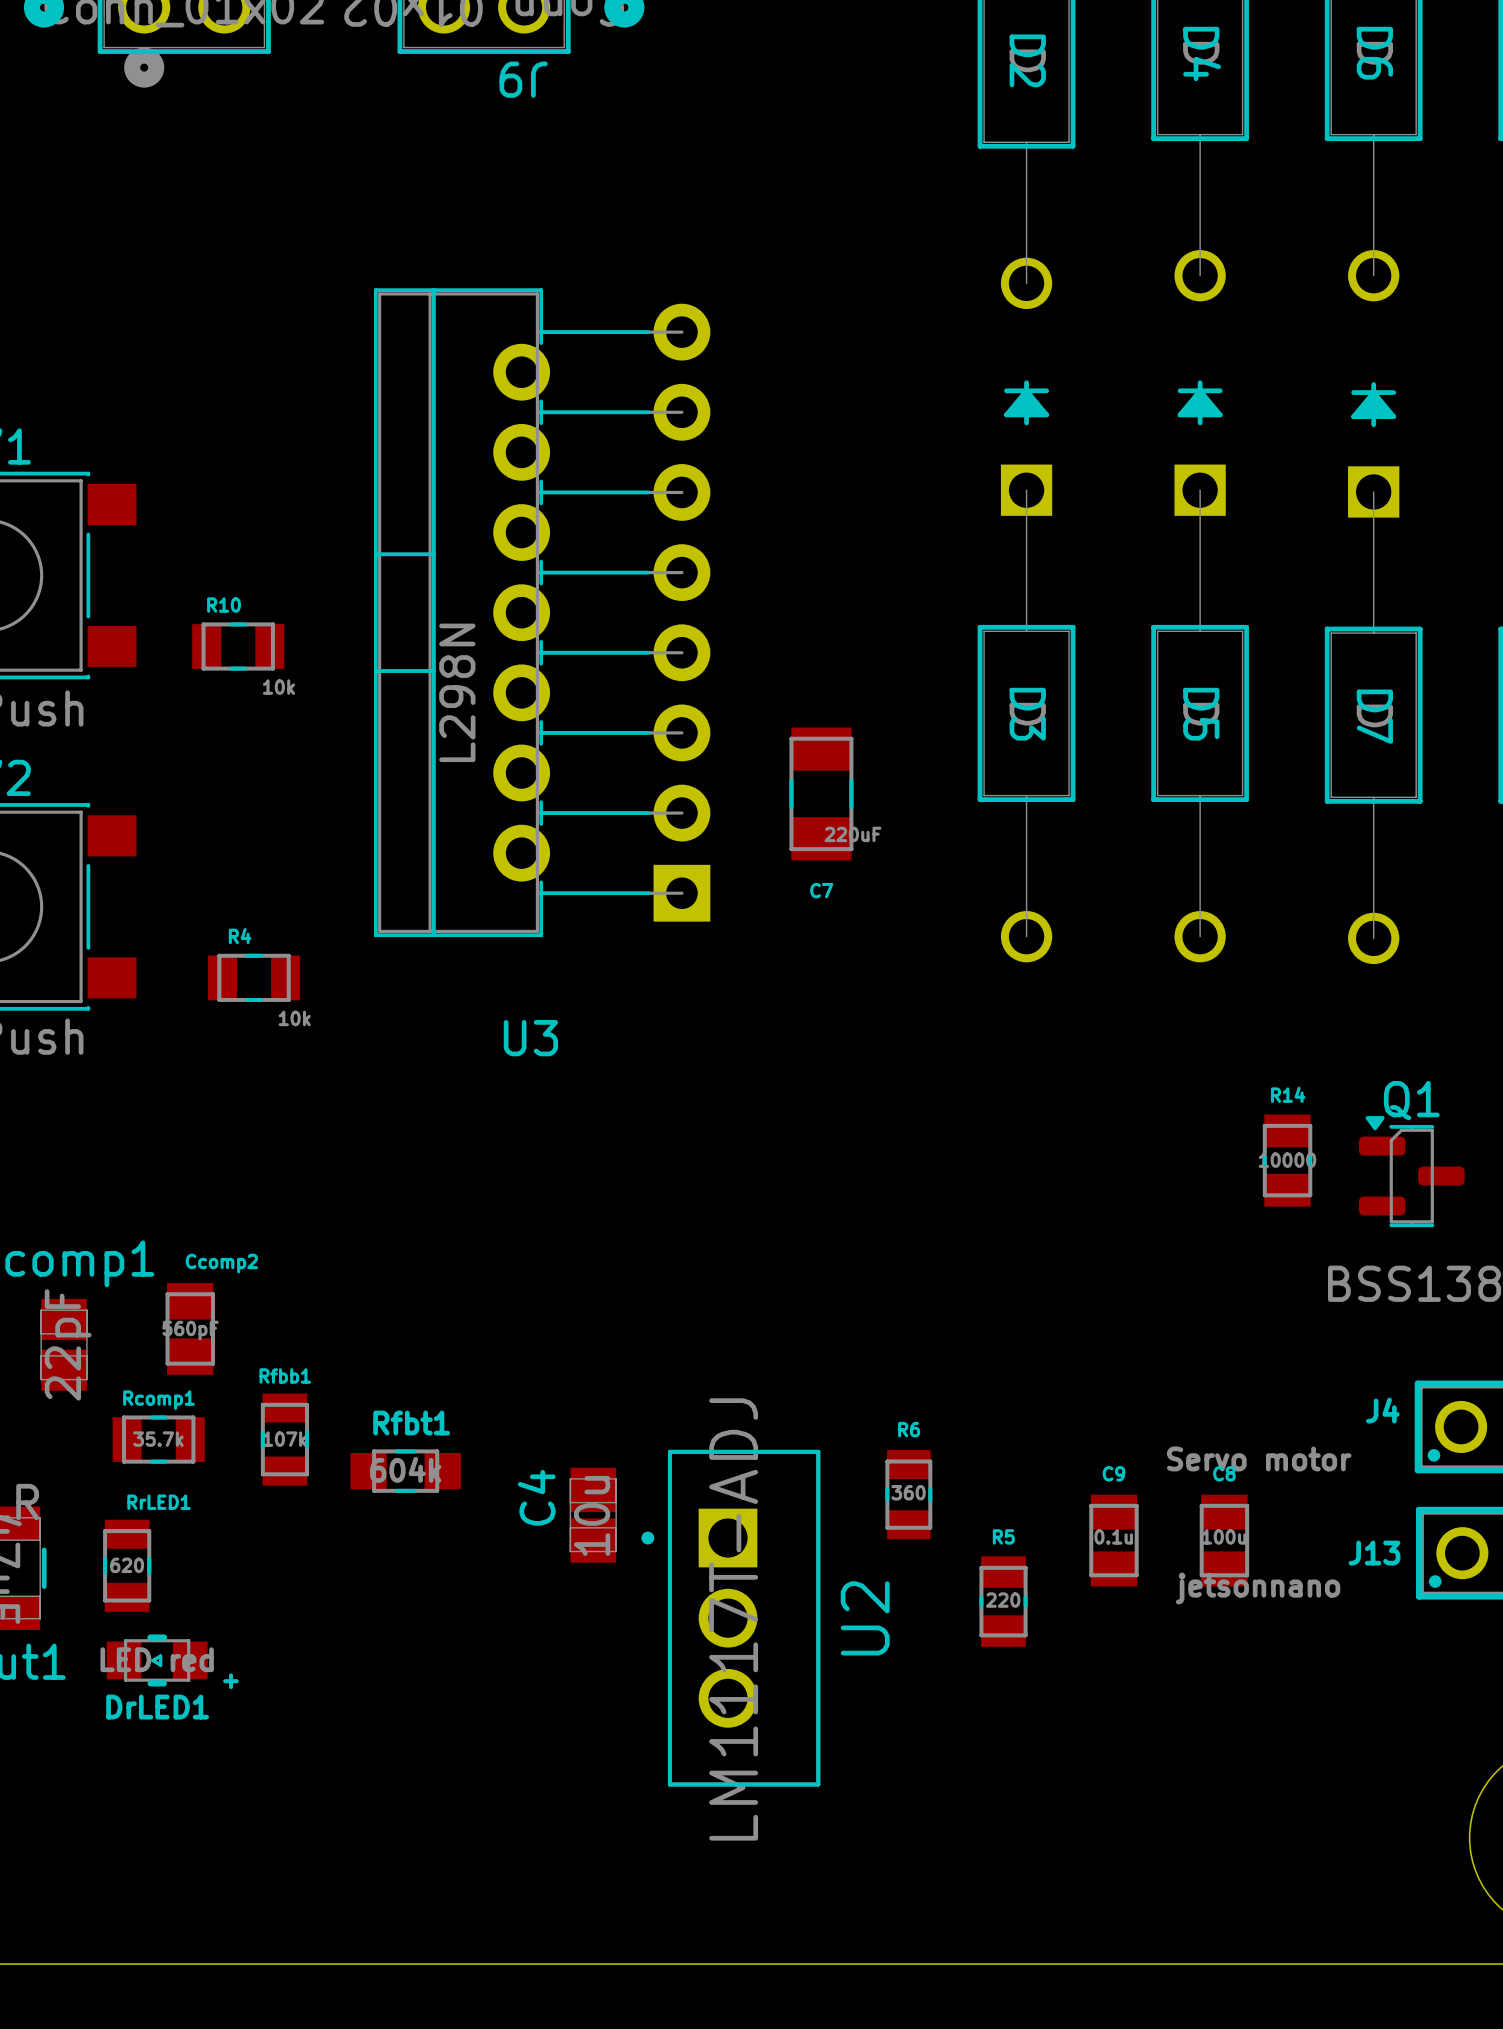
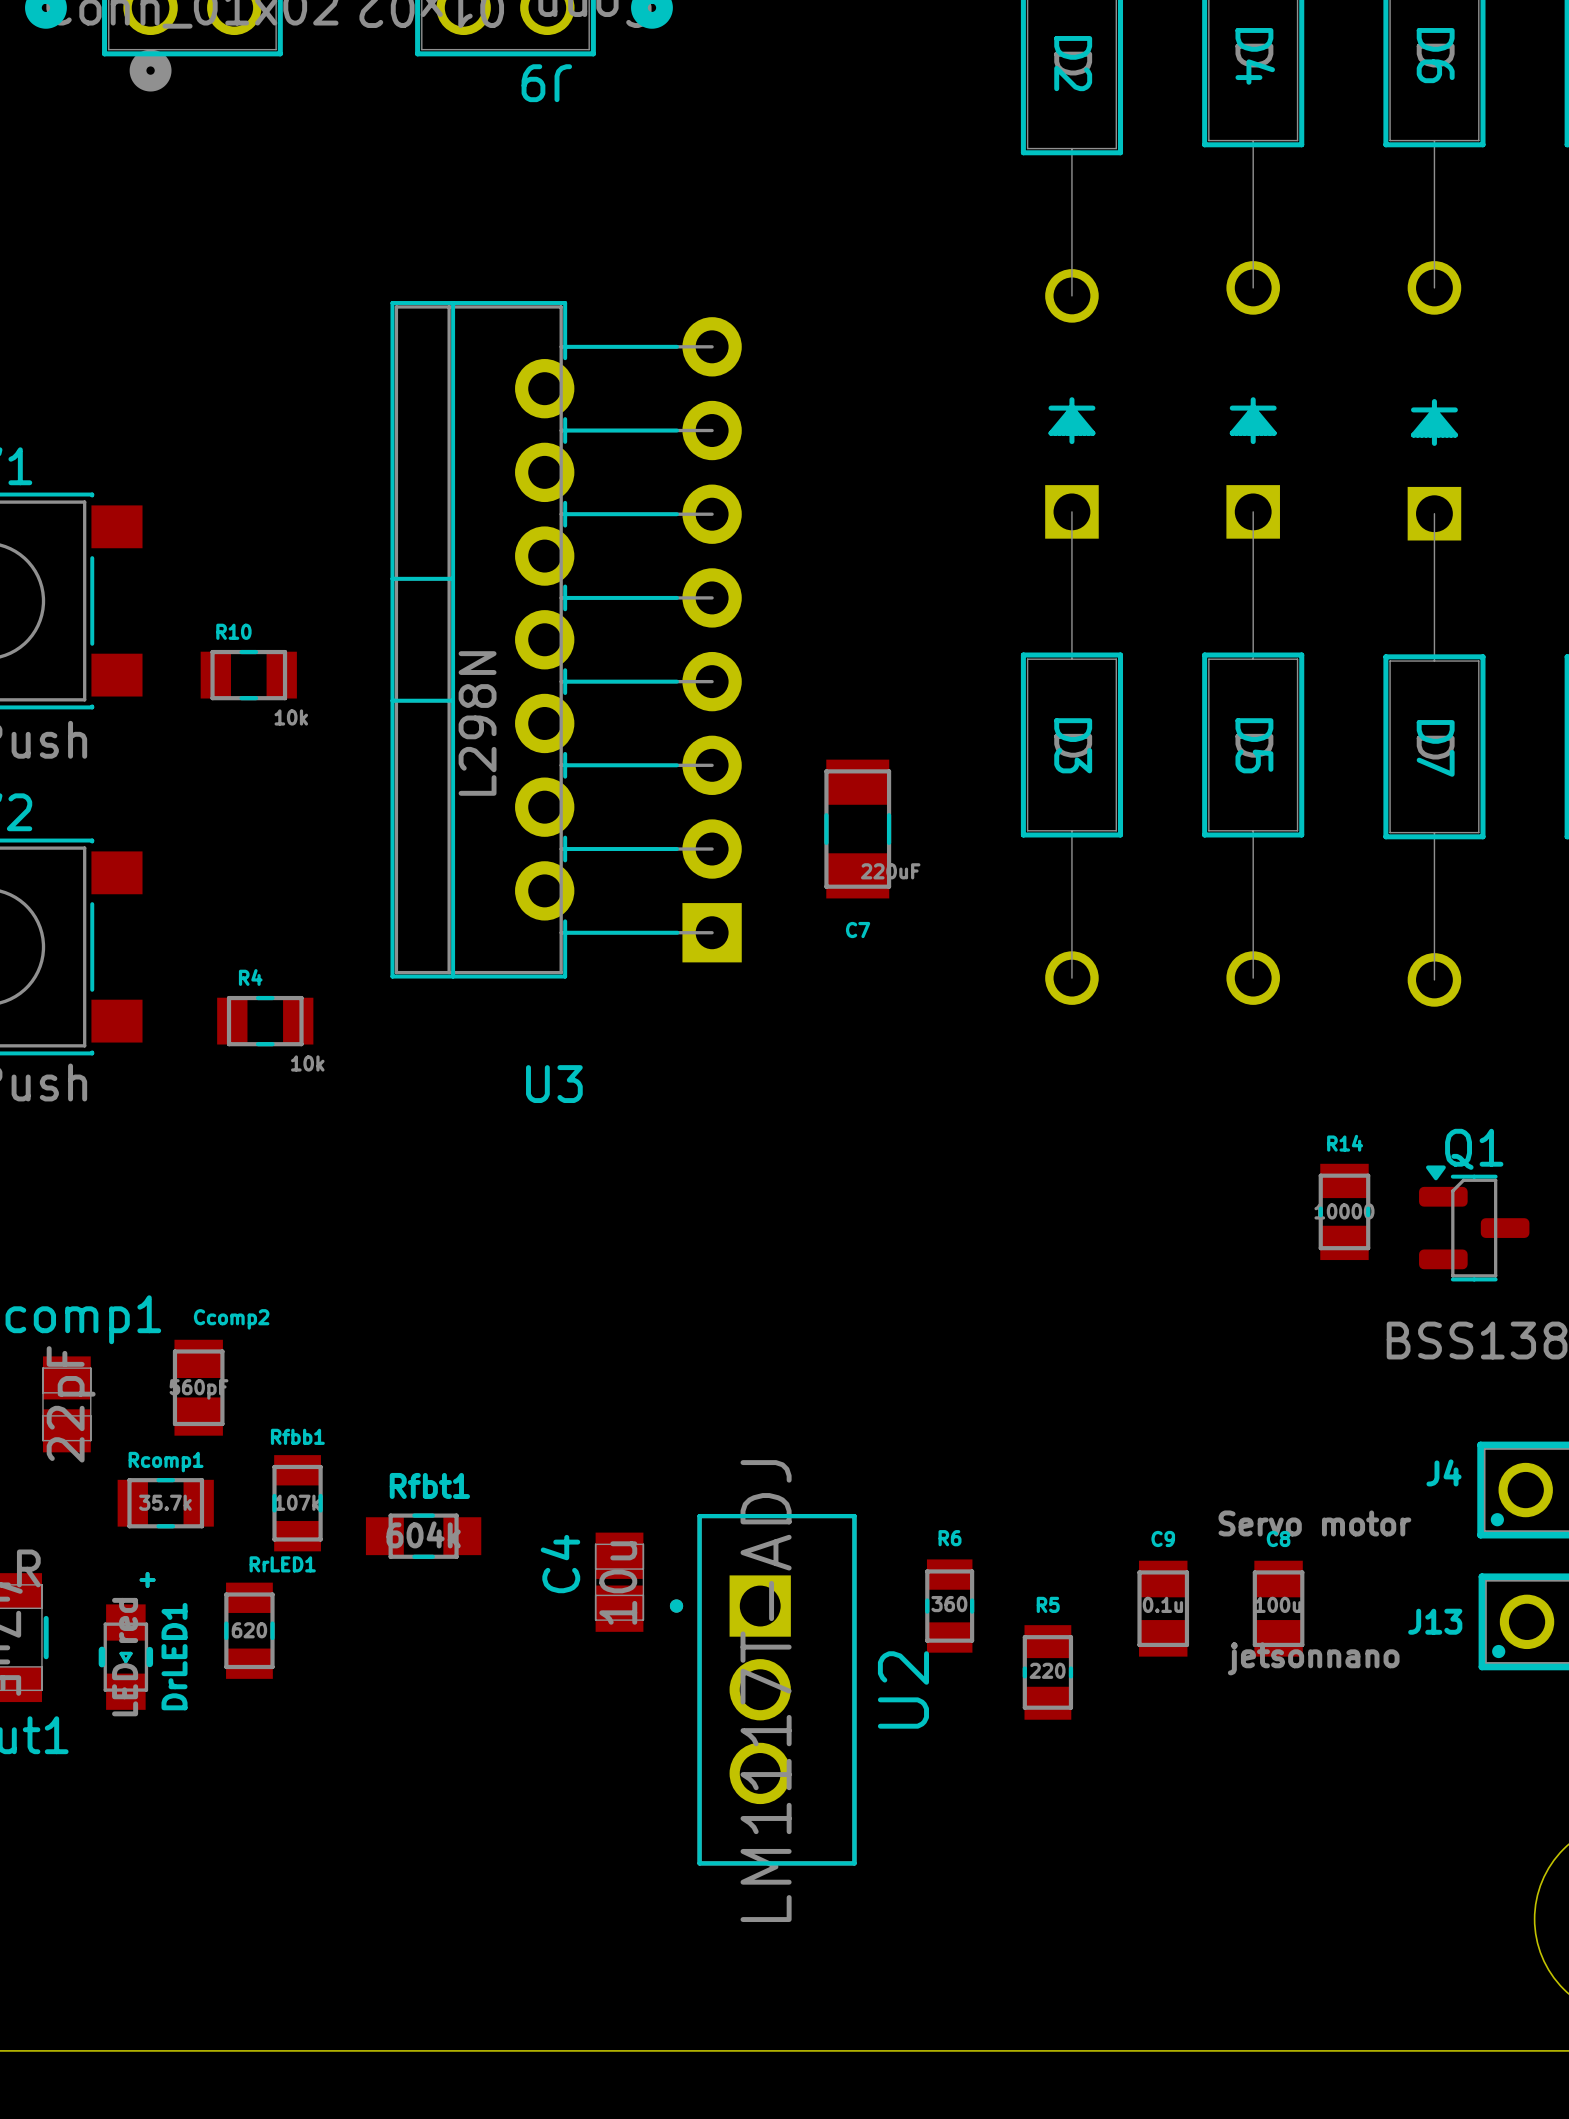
R6 position: (908, 1494) -> (949, 1606)
RrLED1 position: (127, 1565) -> (249, 1630)
DrLED1 rotation: 0° (157, 1660) -> 90° counterclockwise (125, 1657)
DrLED1 position: (157, 1660) -> (125, 1657)

